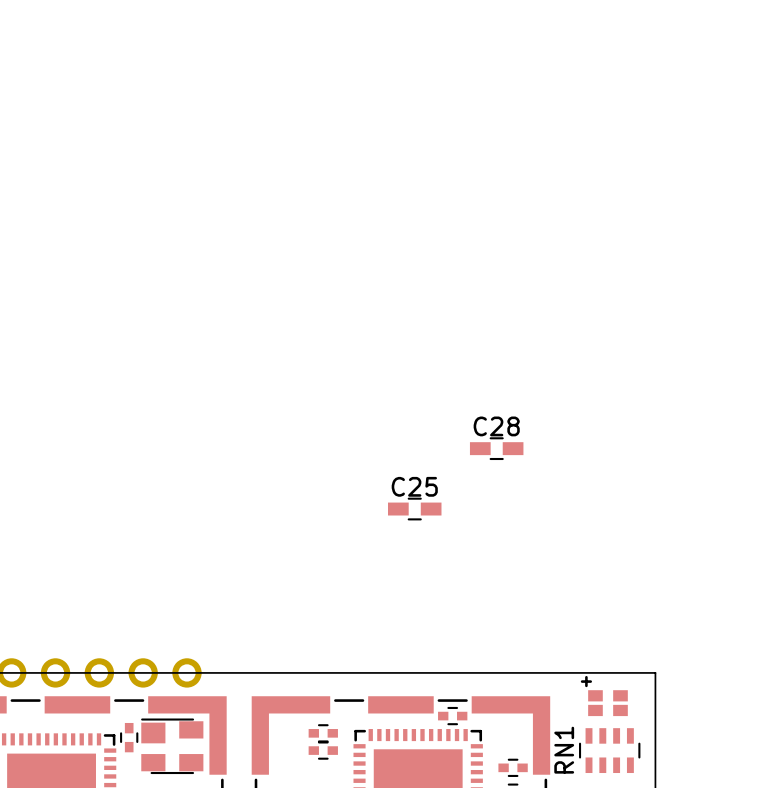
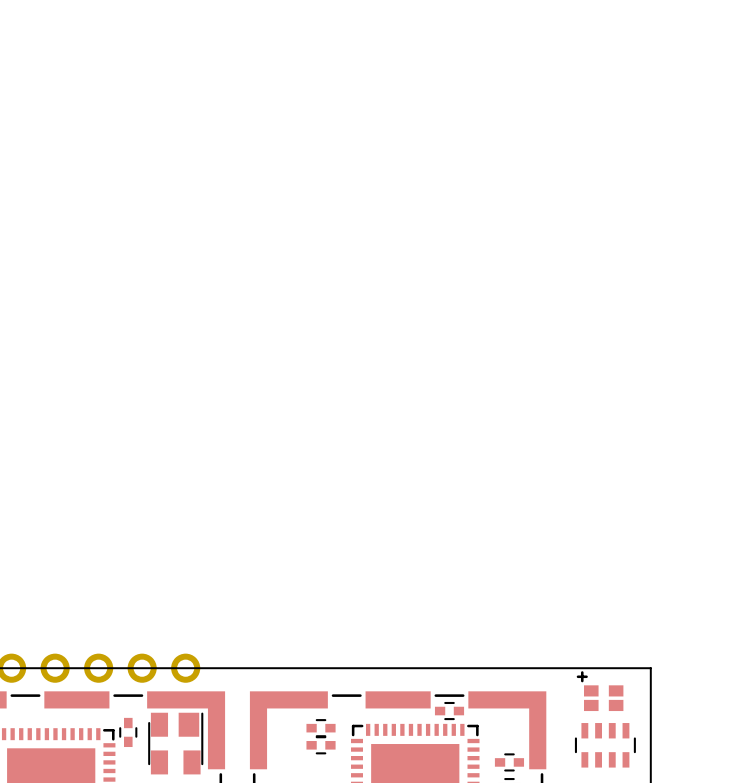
C28: (496, 448) -> none
C25: (414, 509) -> none
part rotation: 0° (172, 746) -> 90° clockwise (175, 743)
RN1 name: RN1 (564, 750) -> none

